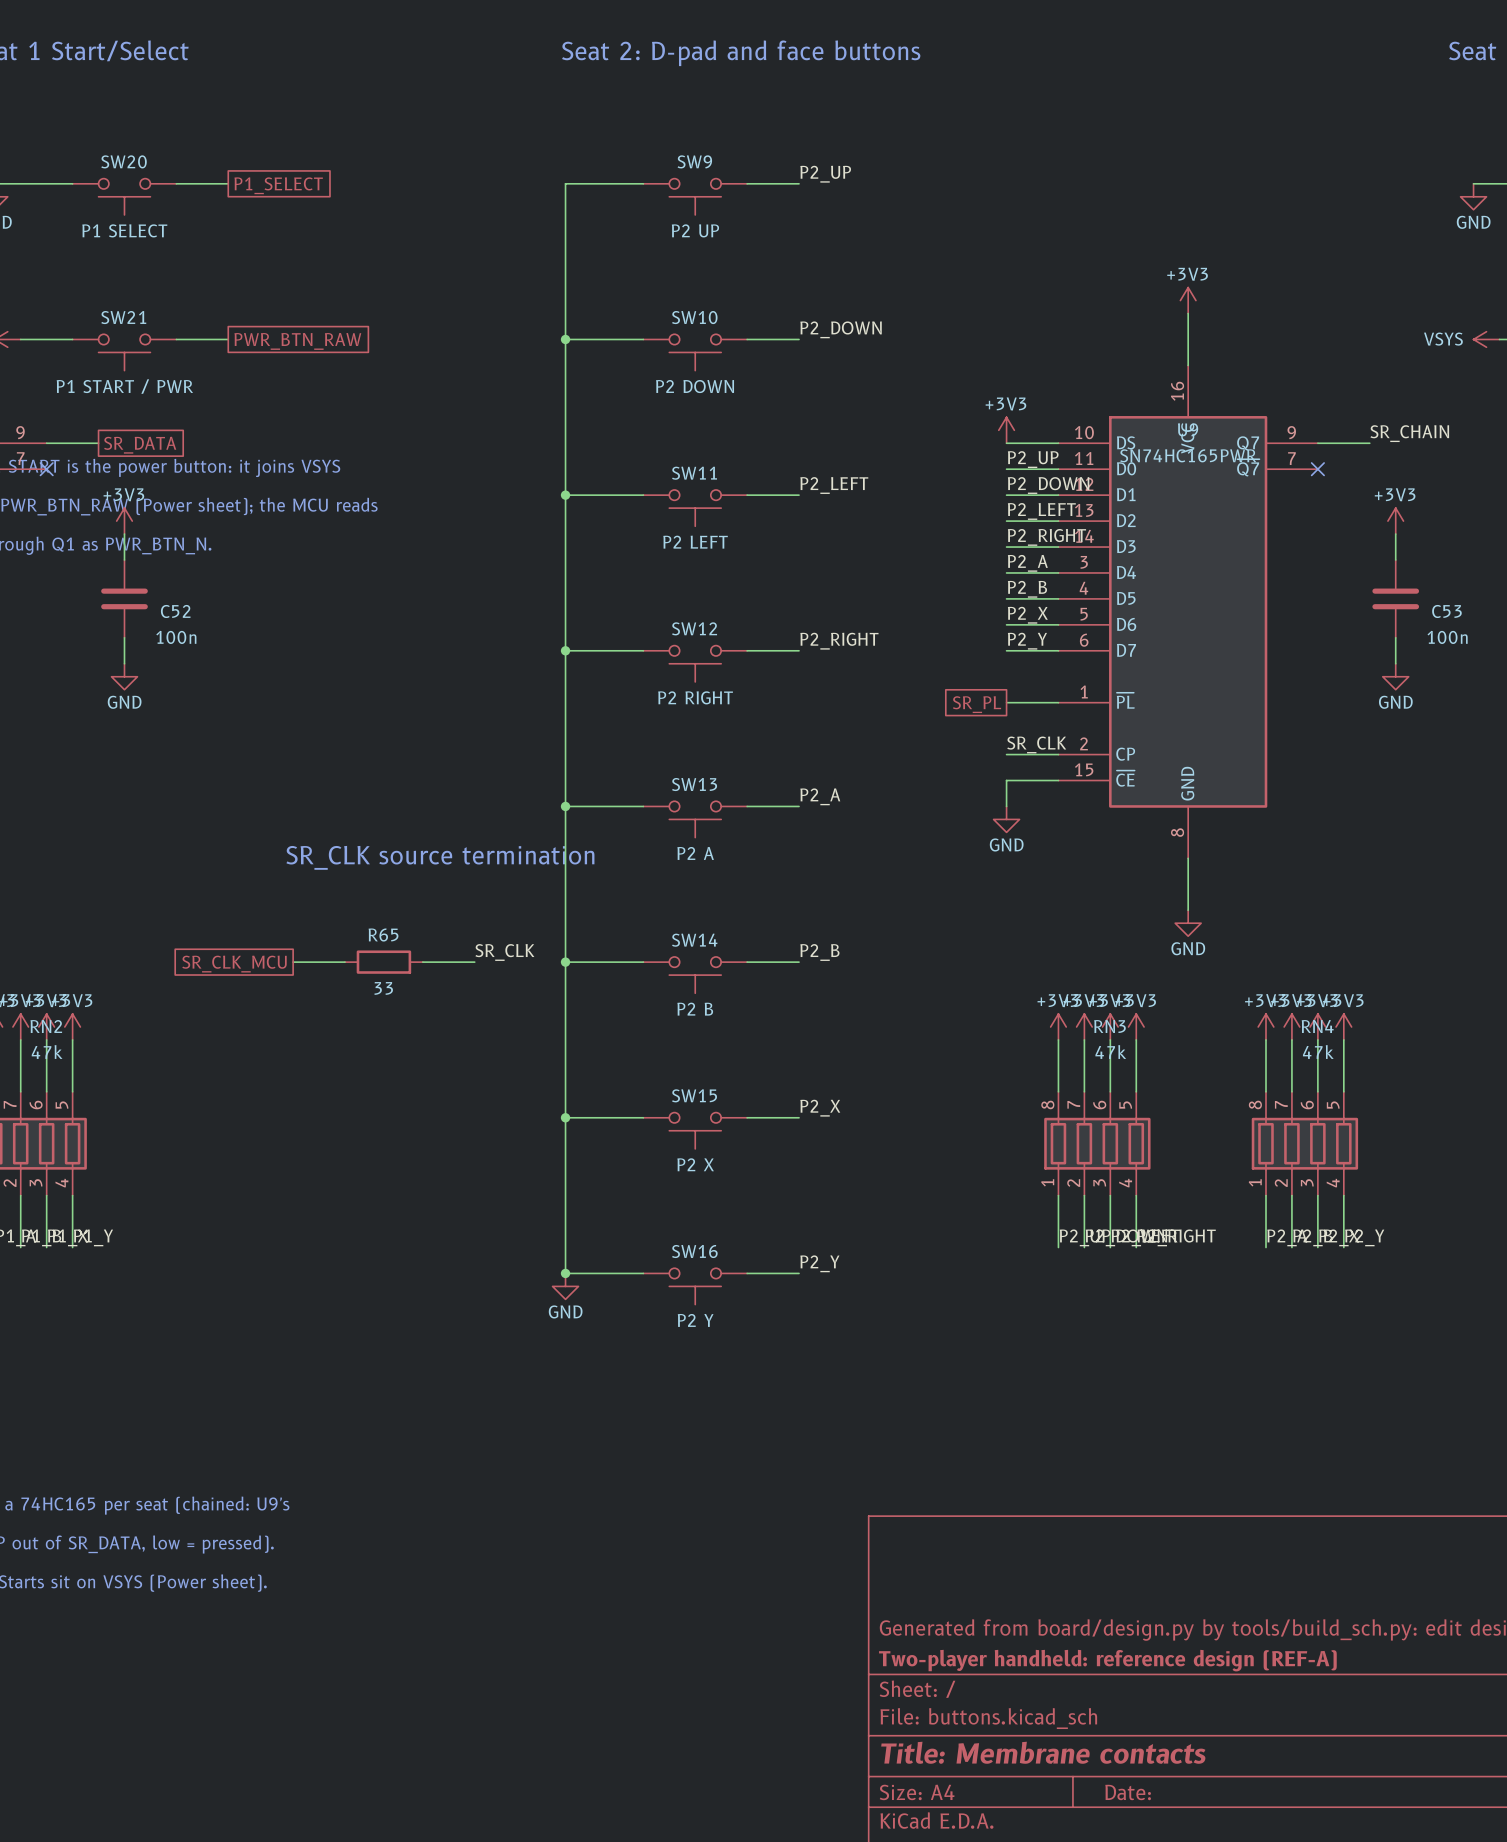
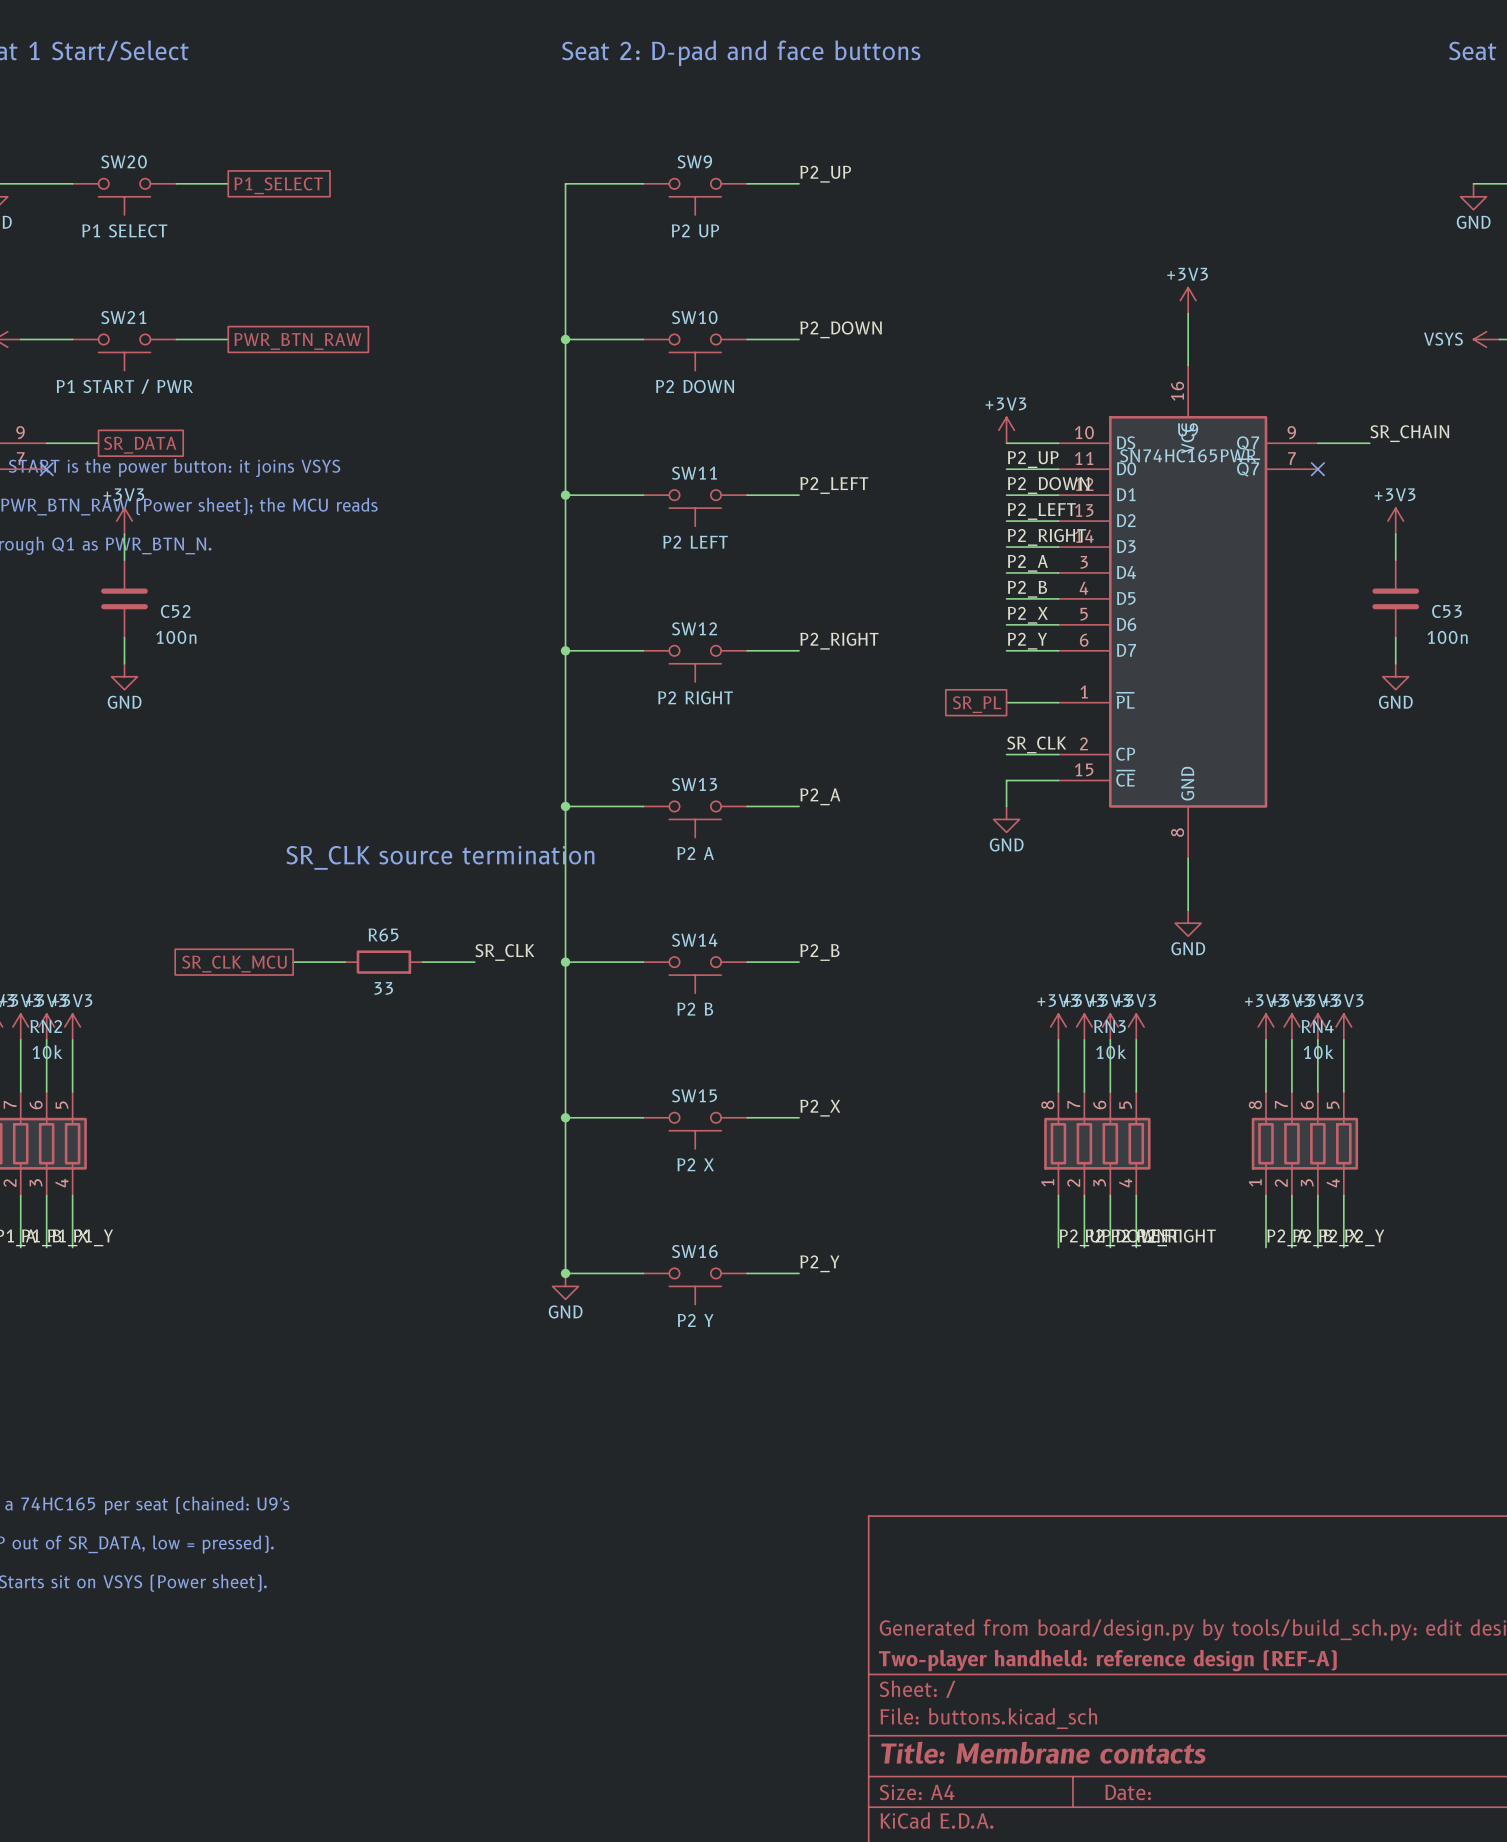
RN2 value: 47k (47, 1052) -> 10k (47, 1052)
RN3 value: 47k (1110, 1052) -> 10k (1111, 1052)
RN4 value: 47k (1318, 1052) -> 10k (1318, 1052)

